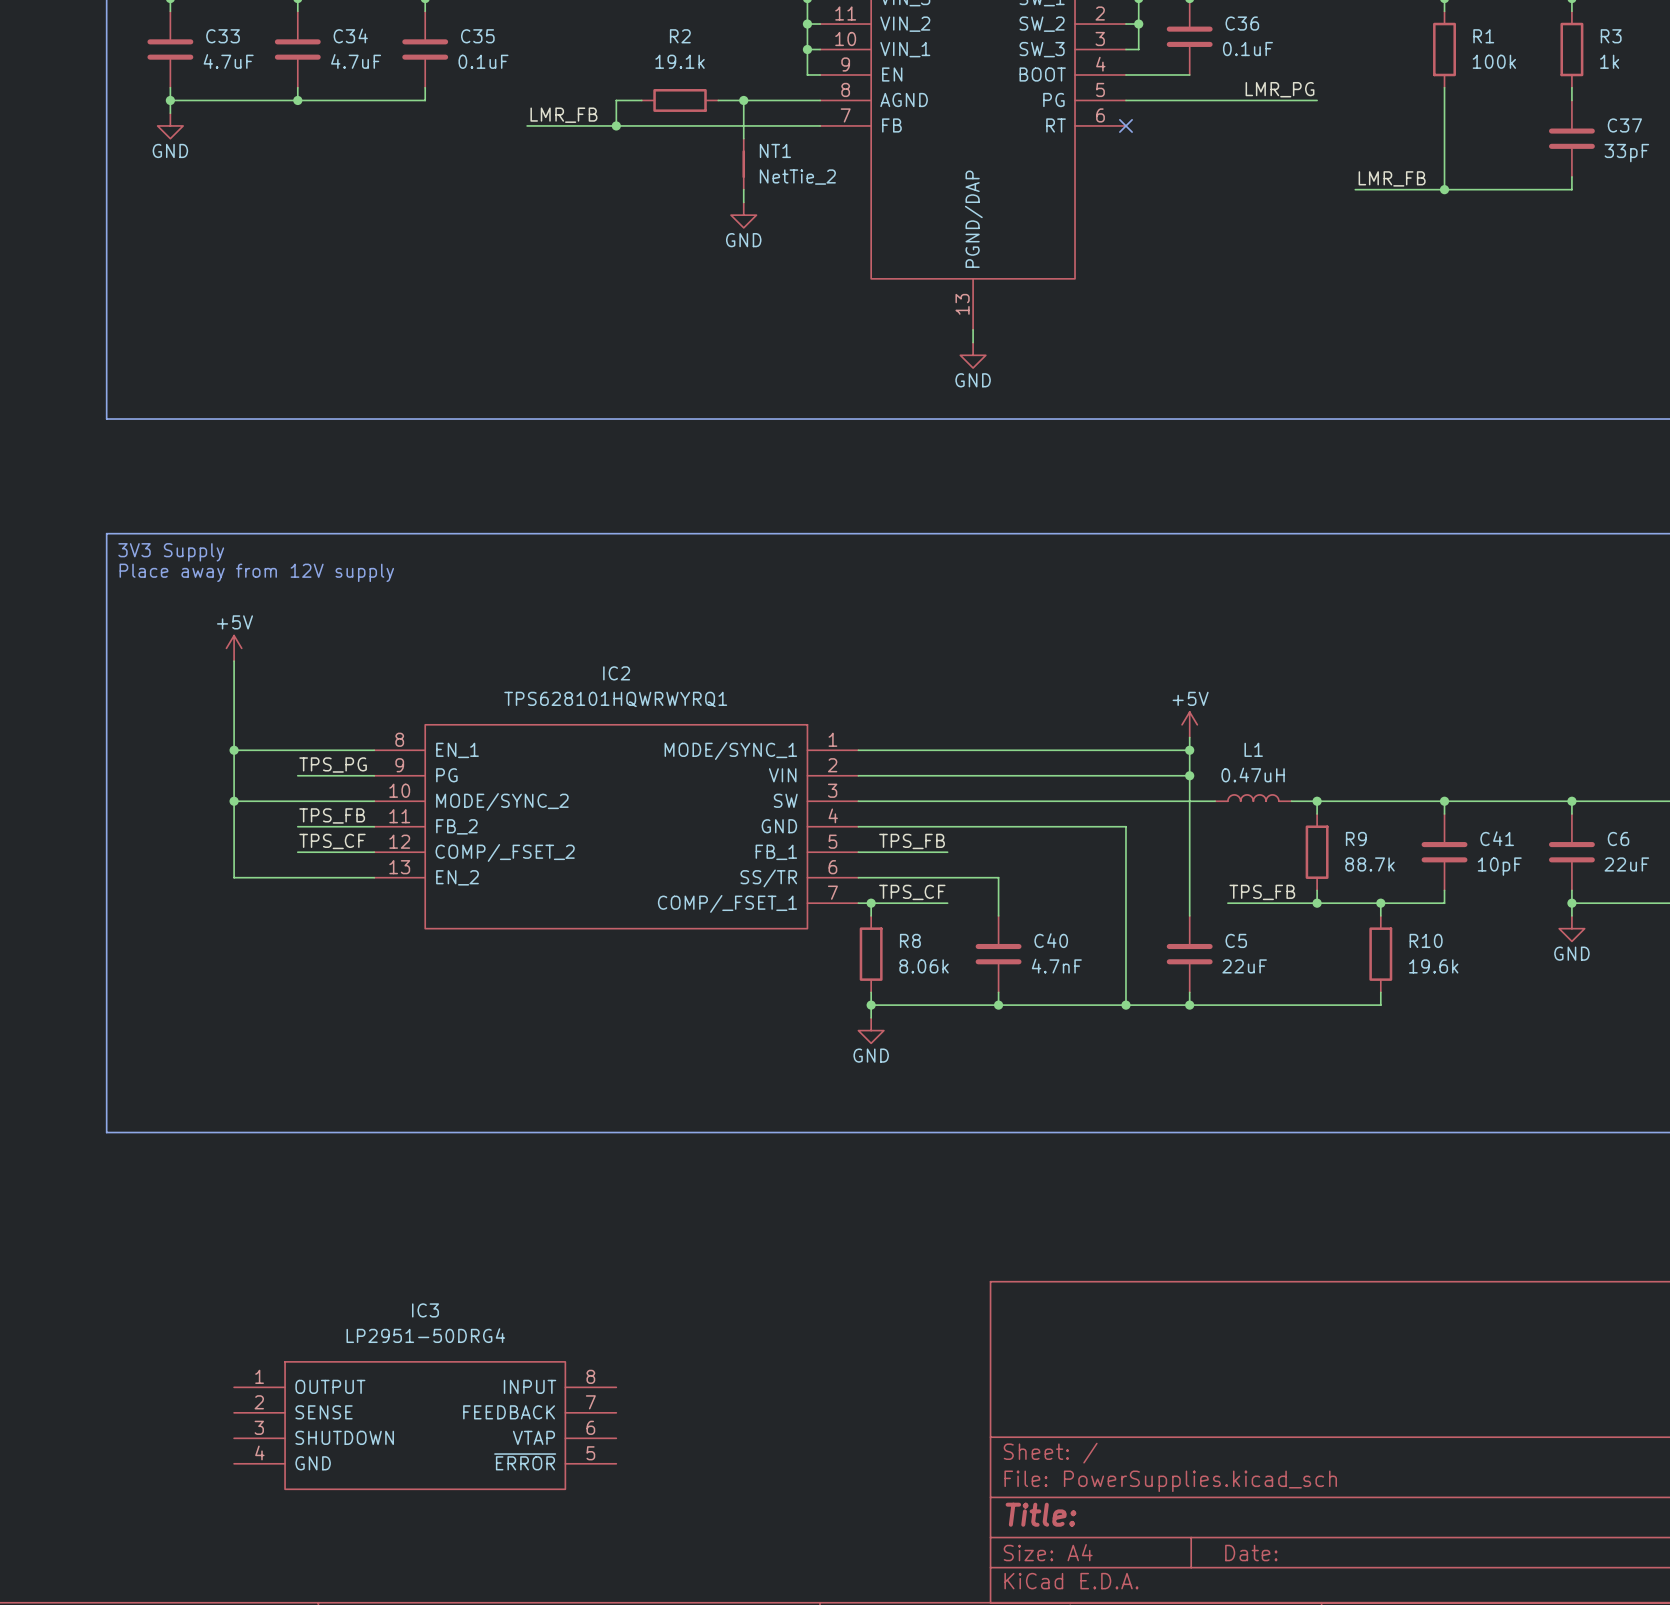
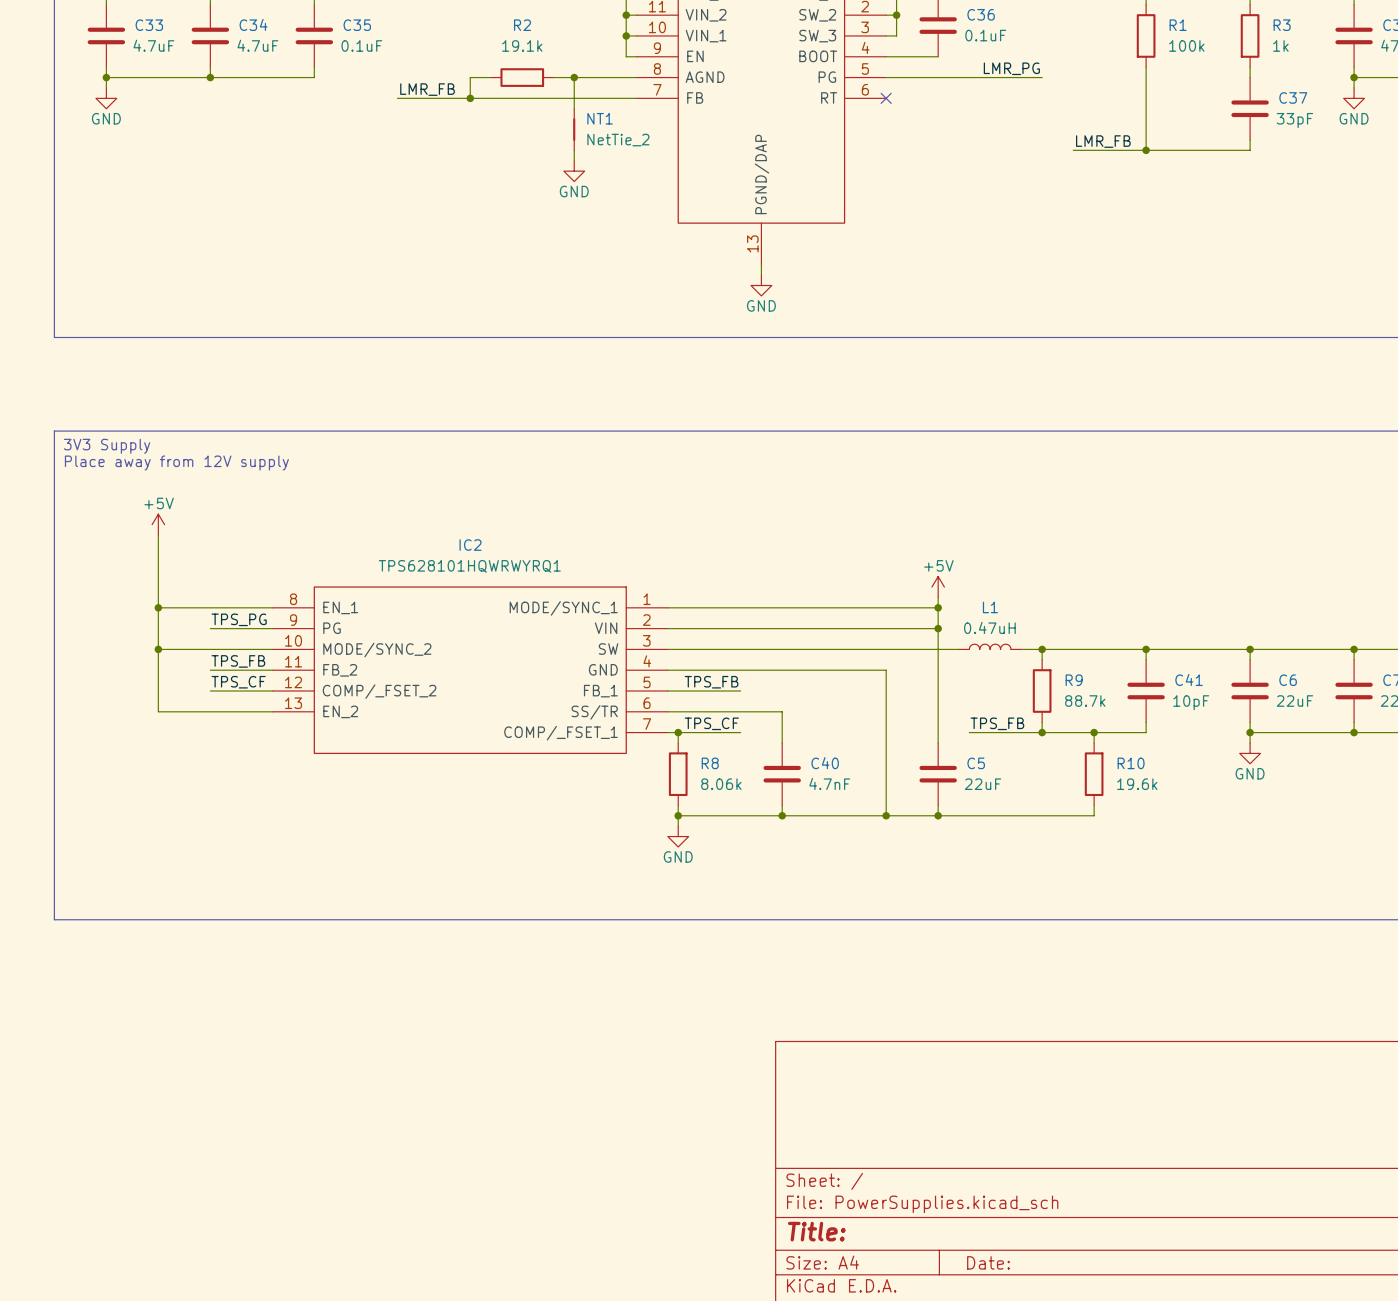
IC3: LP2951-50DRG4 (425, 1425) -> none

